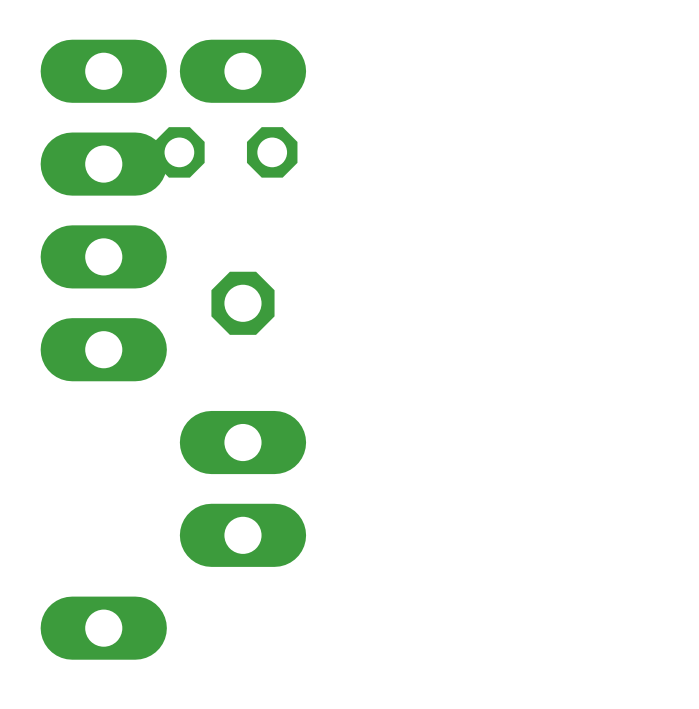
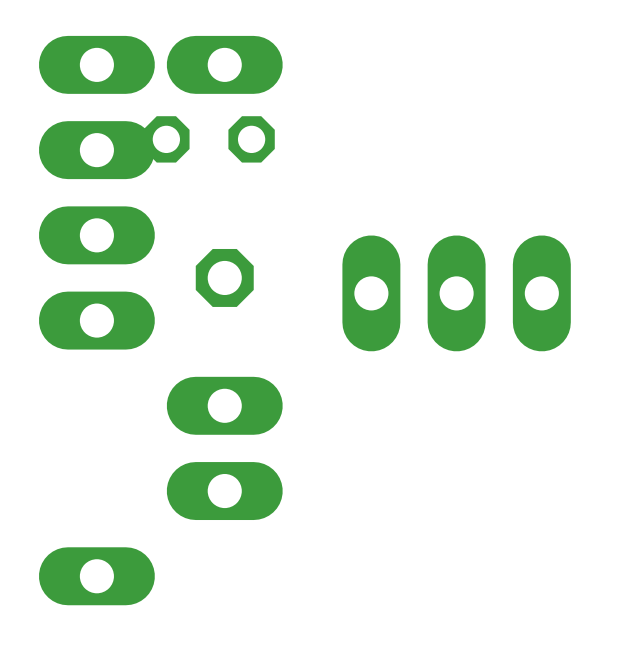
part: none -> (456, 293)

